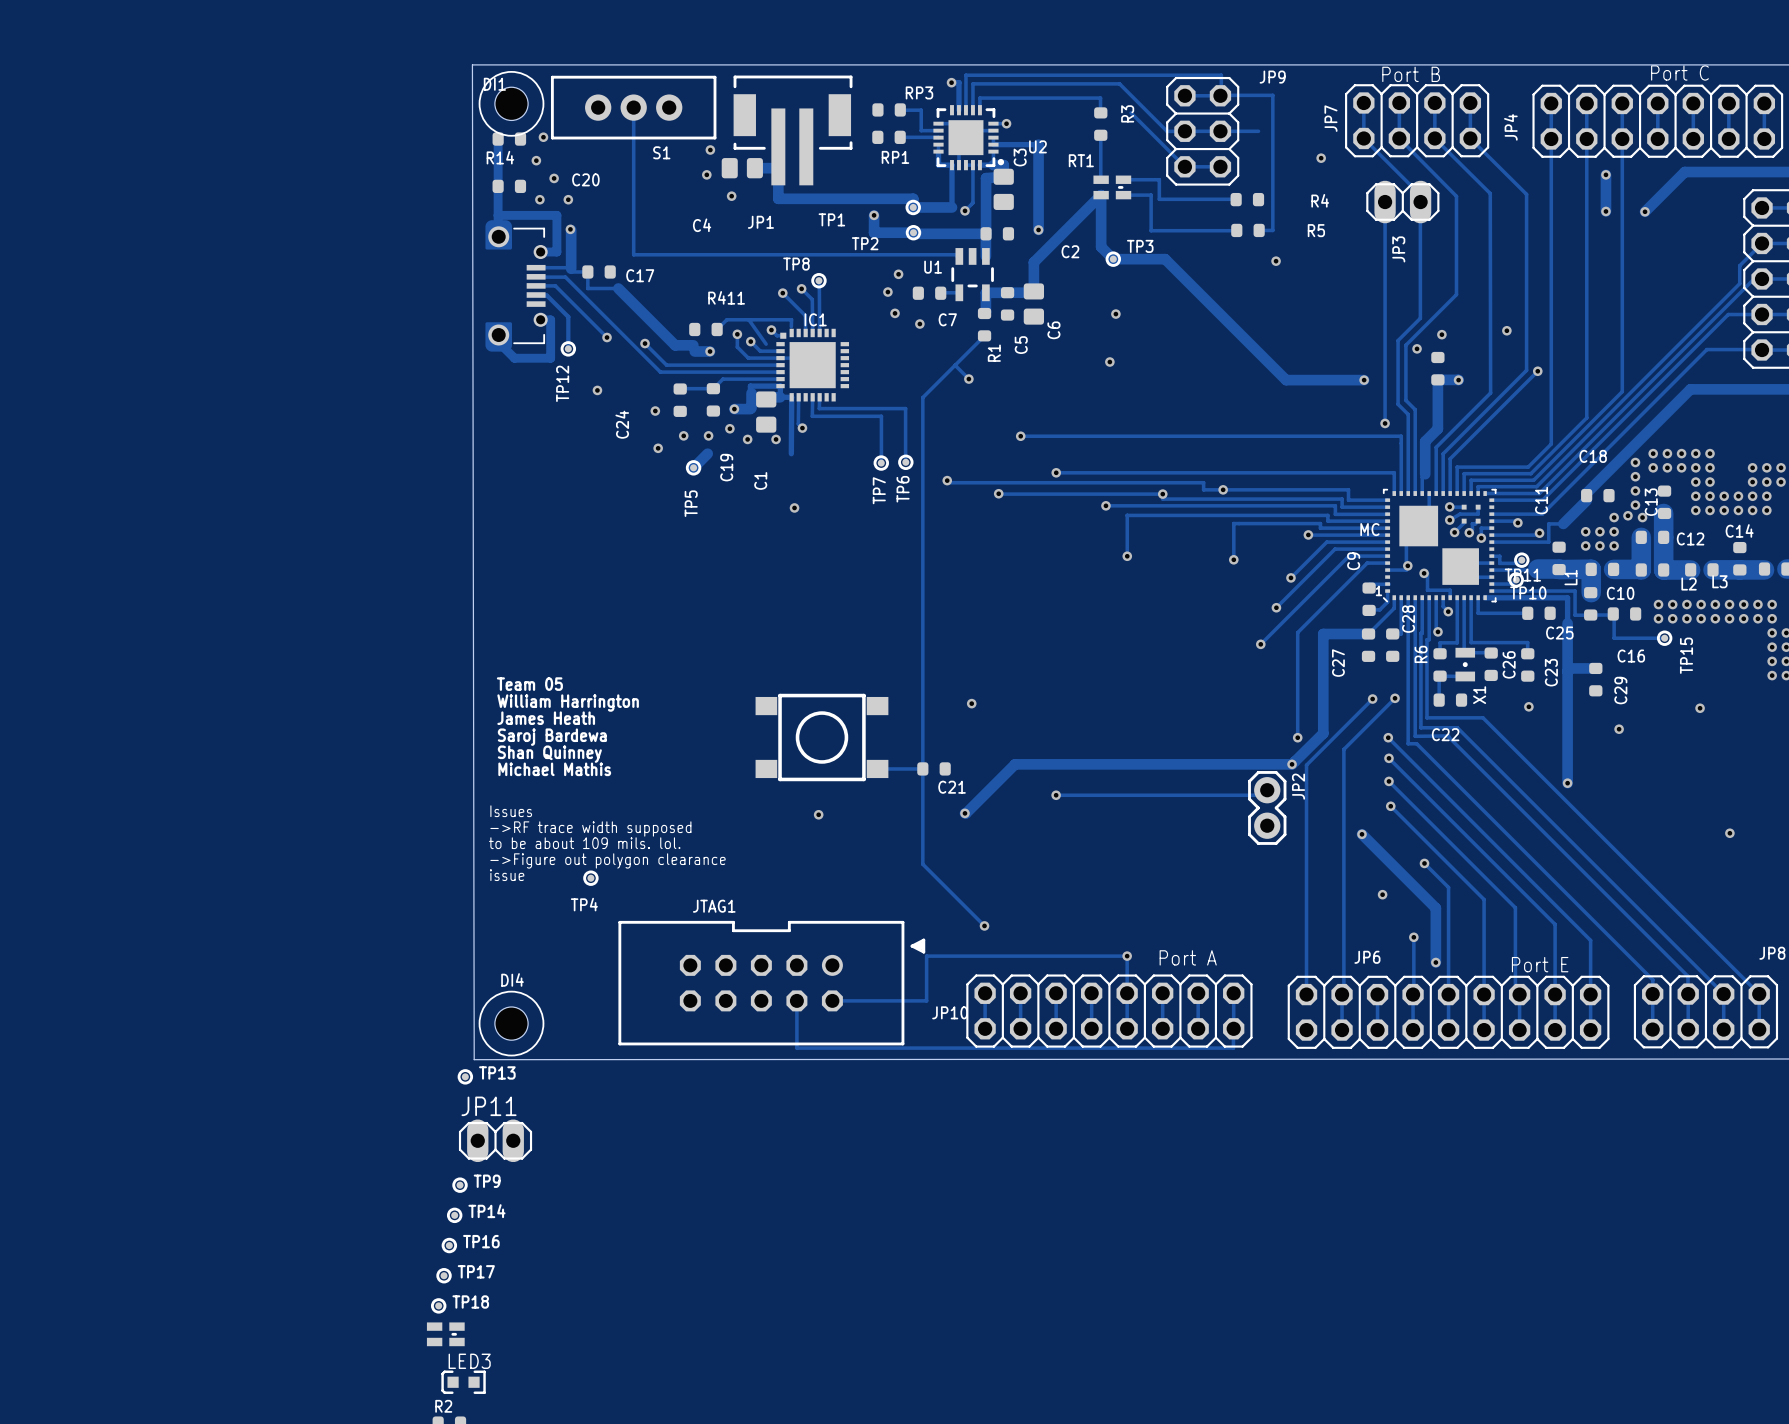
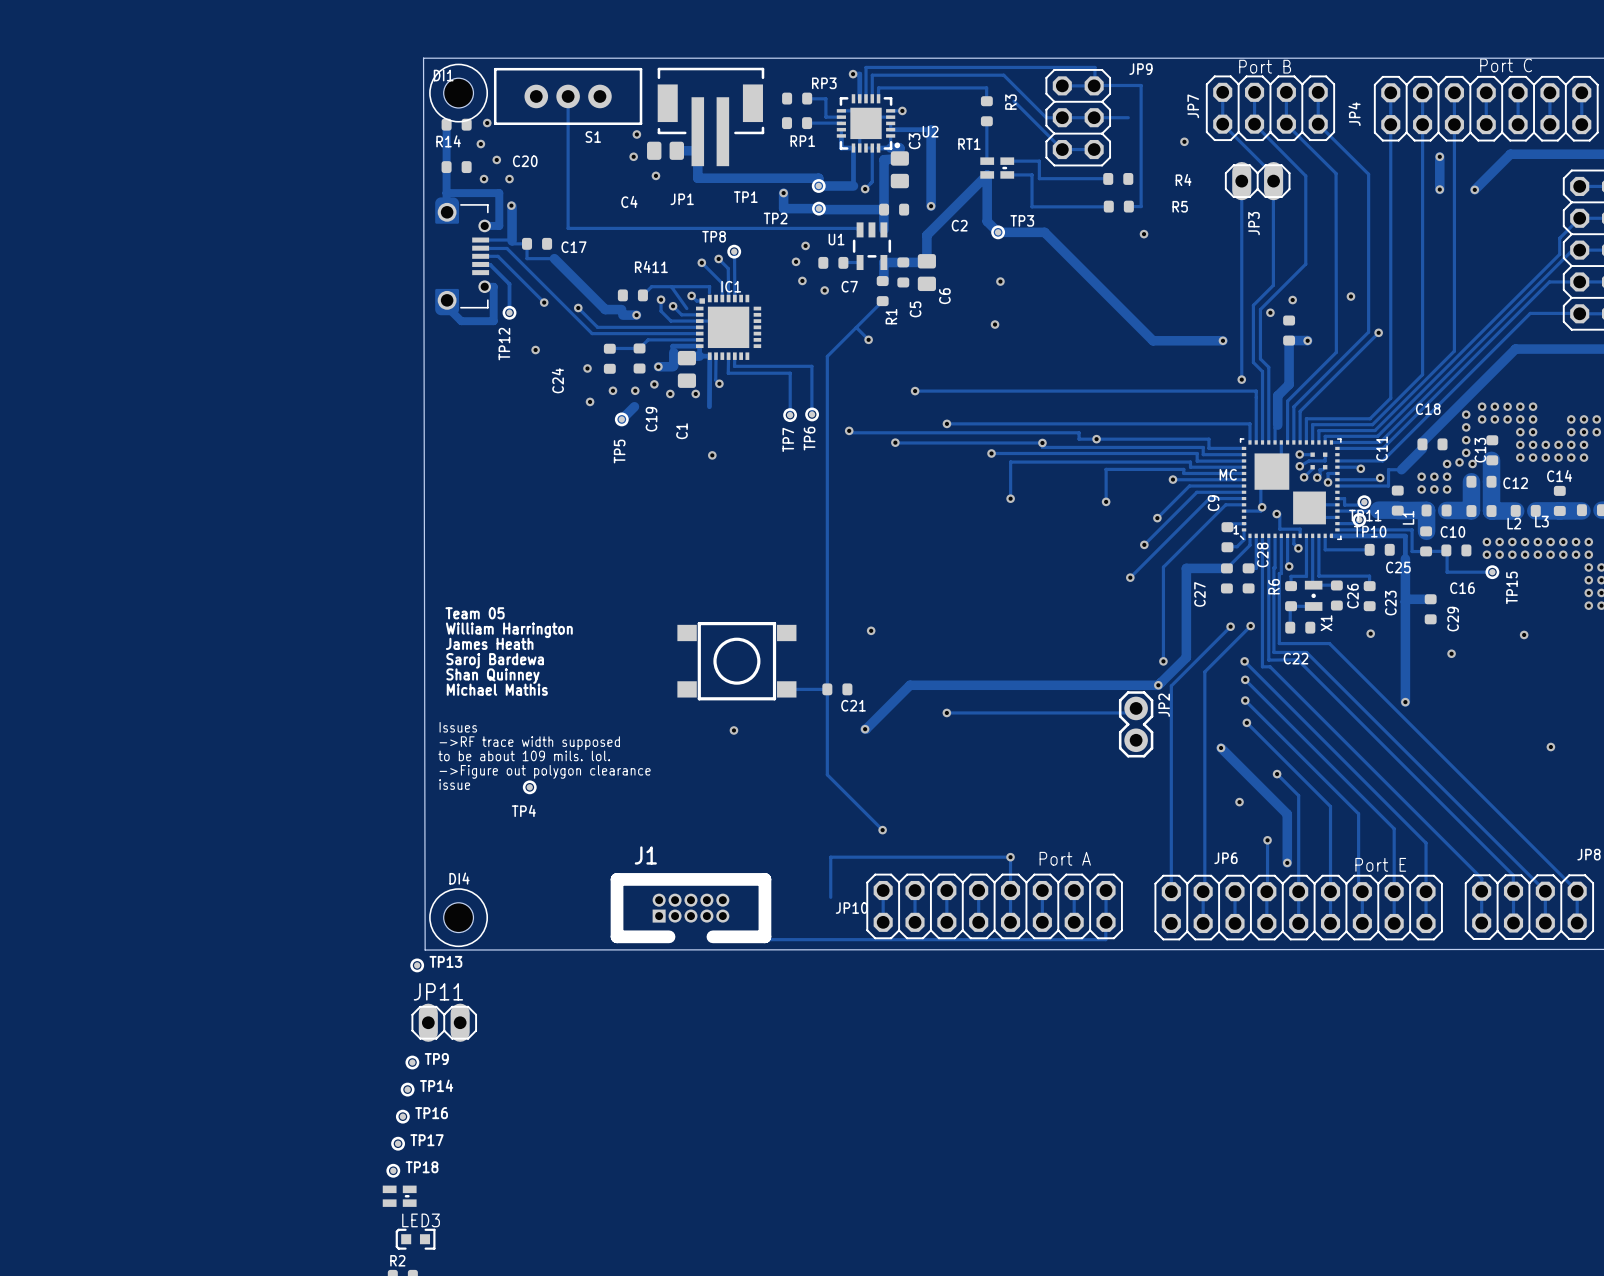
JTAG1: (771, 983) -> none
track: (796, 1000) (796, 1048) -> none
track: (832, 1000) (926, 1000) -> none
J1: none -> (690, 908)

